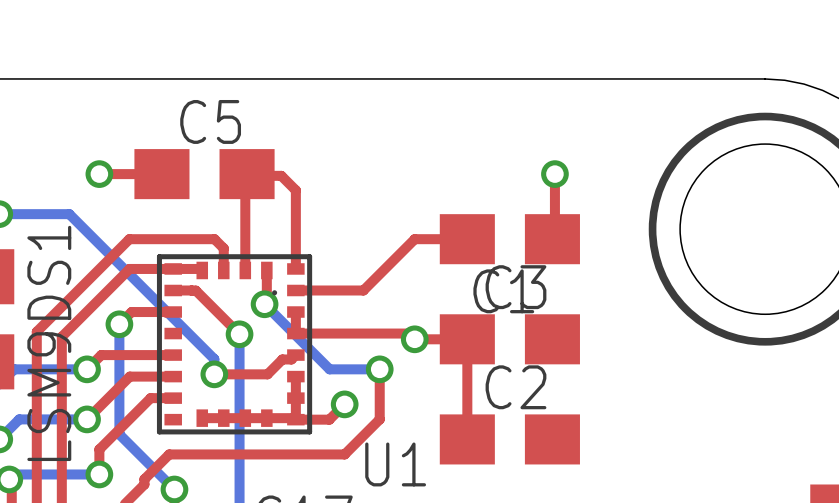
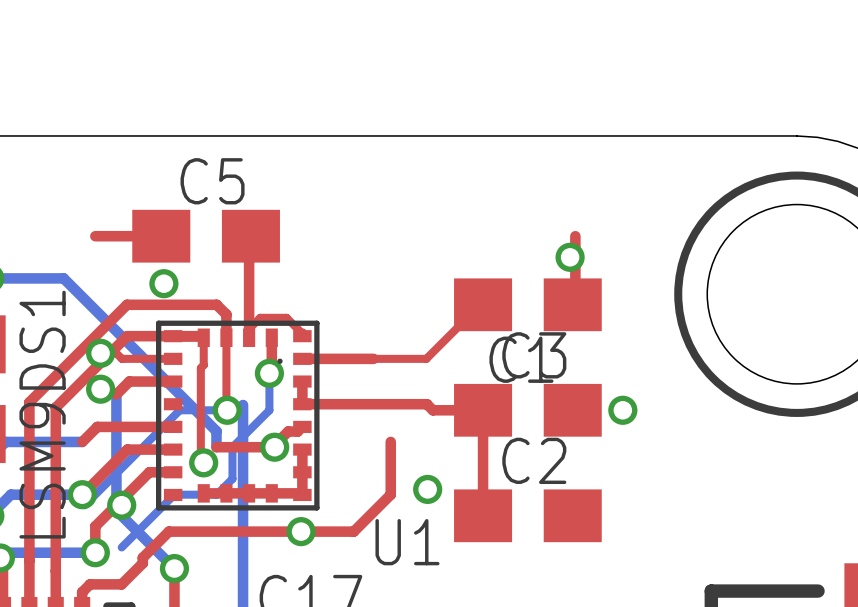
via: (99, 174) -> none
via position: (554, 174) -> (570, 257)
top track: (245, 175) (281, 175) (295, 190) (295, 266) -> none
via: none -> (163, 283)
top track: (464, 239) (414, 239) (363, 290) -> (483, 304) (480, 304) (426, 358) (373, 358)
top track: none -> (249, 328) (260, 317) (286, 317) (302, 333) (302, 336)
top track: none -> (173, 336) (203, 337) (203, 365) (200, 368) (200, 460) (203, 462)
top track: none -> (226, 337) (227, 410)
via: none -> (100, 353)
top track: (173, 290) (195, 290) (239, 334) -> (173, 358) (121, 358) (116, 353) (100, 353)
bottom track: (264, 304) (329, 369) (379, 369) -> none
bottom track: none -> (269, 383) (269, 410) (232, 447) (232, 478) (216, 494) (174, 494) (121, 547)
via position: (119, 324) -> (100, 389)
via position: (239, 334) -> (227, 410)
bottom track: none -> (227, 410) (179, 410) (84, 505)
via: (414, 339) -> none
via: none -> (622, 410)
via: (87, 369) -> none
via: (379, 369) -> none
via position: (214, 374) -> (203, 462)
via: none -> (274, 447)
top track: (344, 404) (329, 419) (295, 419) -> none
via: (344, 404) -> none
via: none -> (427, 489)
via: none -> (121, 505)
via: none -> (301, 531)

